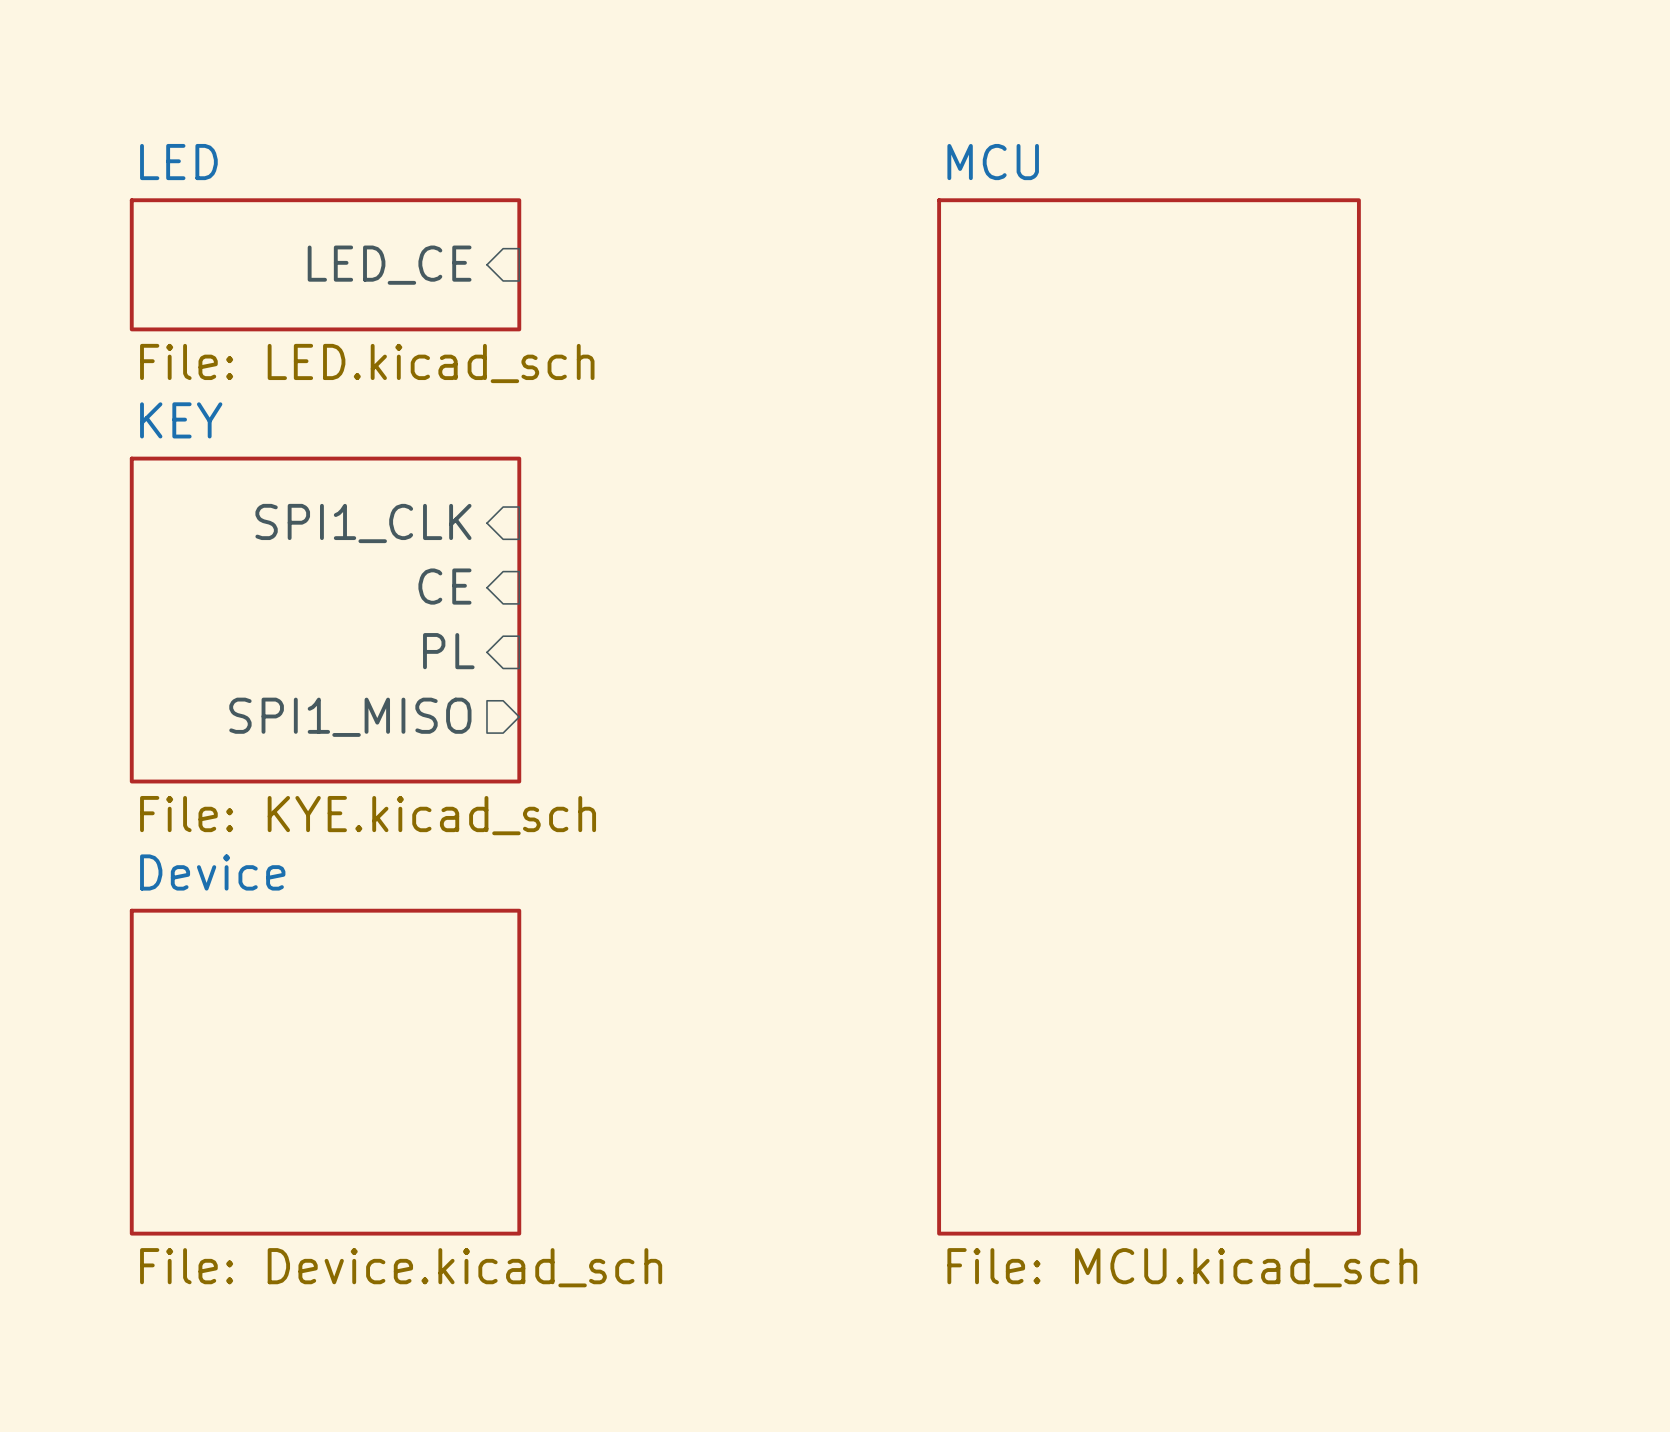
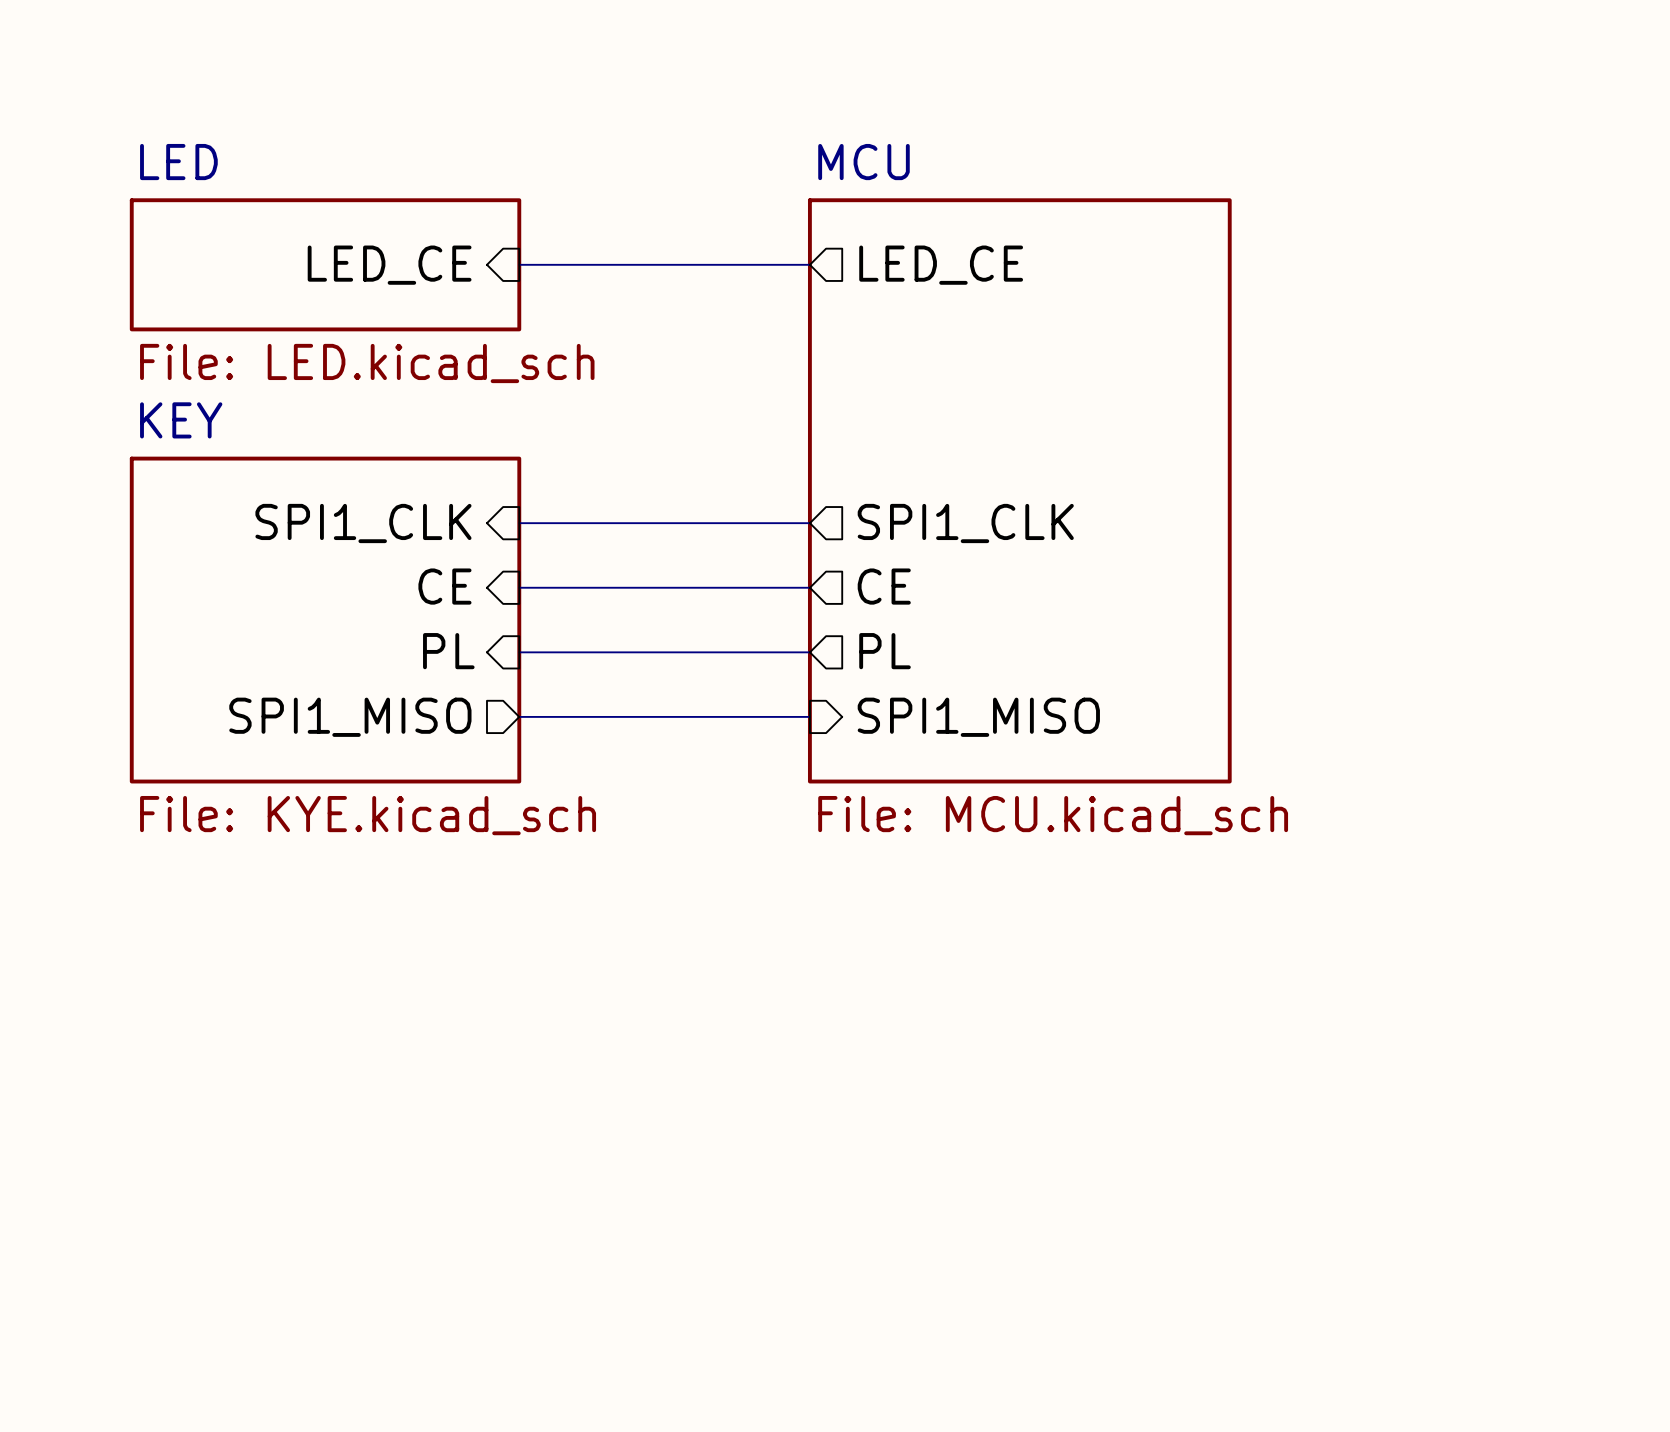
wire: none -> (519, 264) (809, 264)
sheet pin: none -> LED_CE (941, 265)
sheet MCU: none -> File: MCU.kicad_sch (1019, 490)
wire: none -> (519, 523) (809, 523)
sheet pin: none -> SPI1_CLK (965, 523)
sheet pin: none -> CE (884, 586)
wire: none -> (519, 587) (809, 587)
sheet pin: none -> PL (885, 651)
wire: none -> (519, 652) (809, 652)
wire: none -> (519, 716) (809, 716)
sheet MCU: File: MCU.kicad_sch (1149, 716) -> none
sheet pin: none -> SPI1_MISO (978, 717)
sheet Device: File: Device.kicad_sch (325, 1072) -> none

